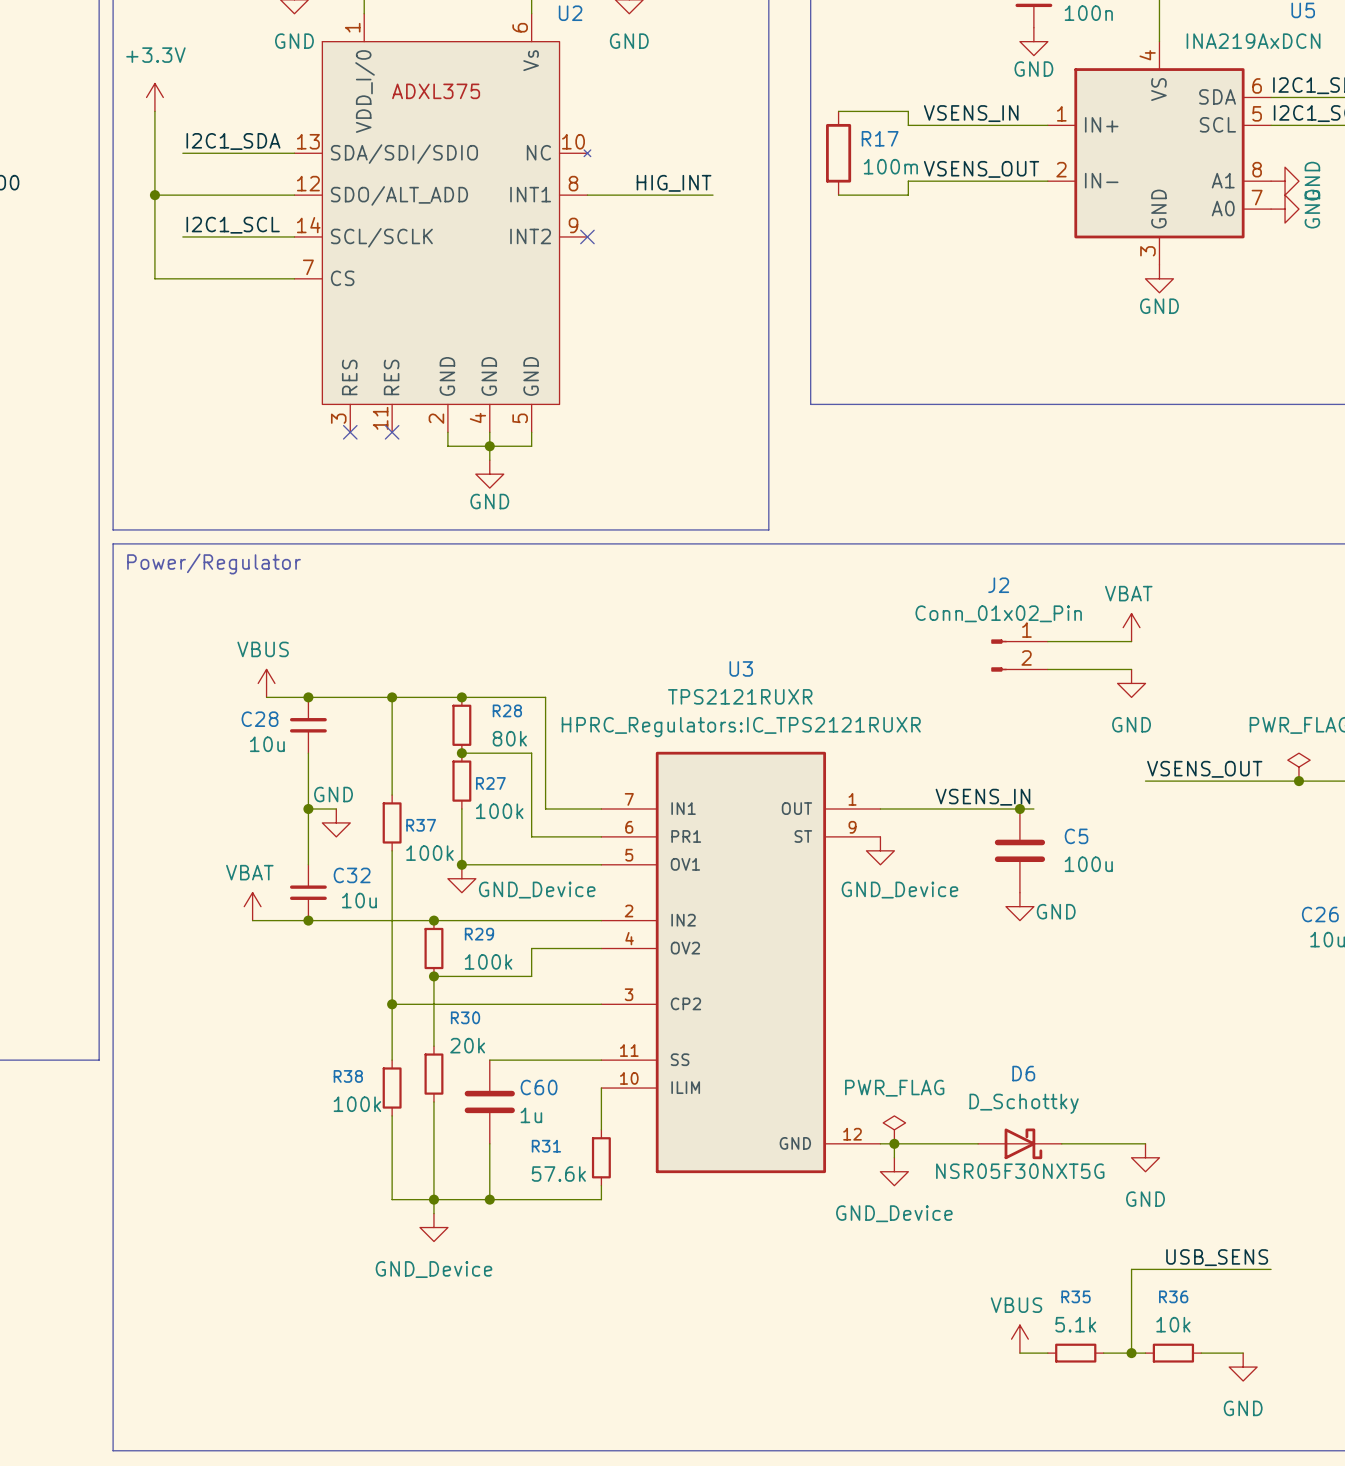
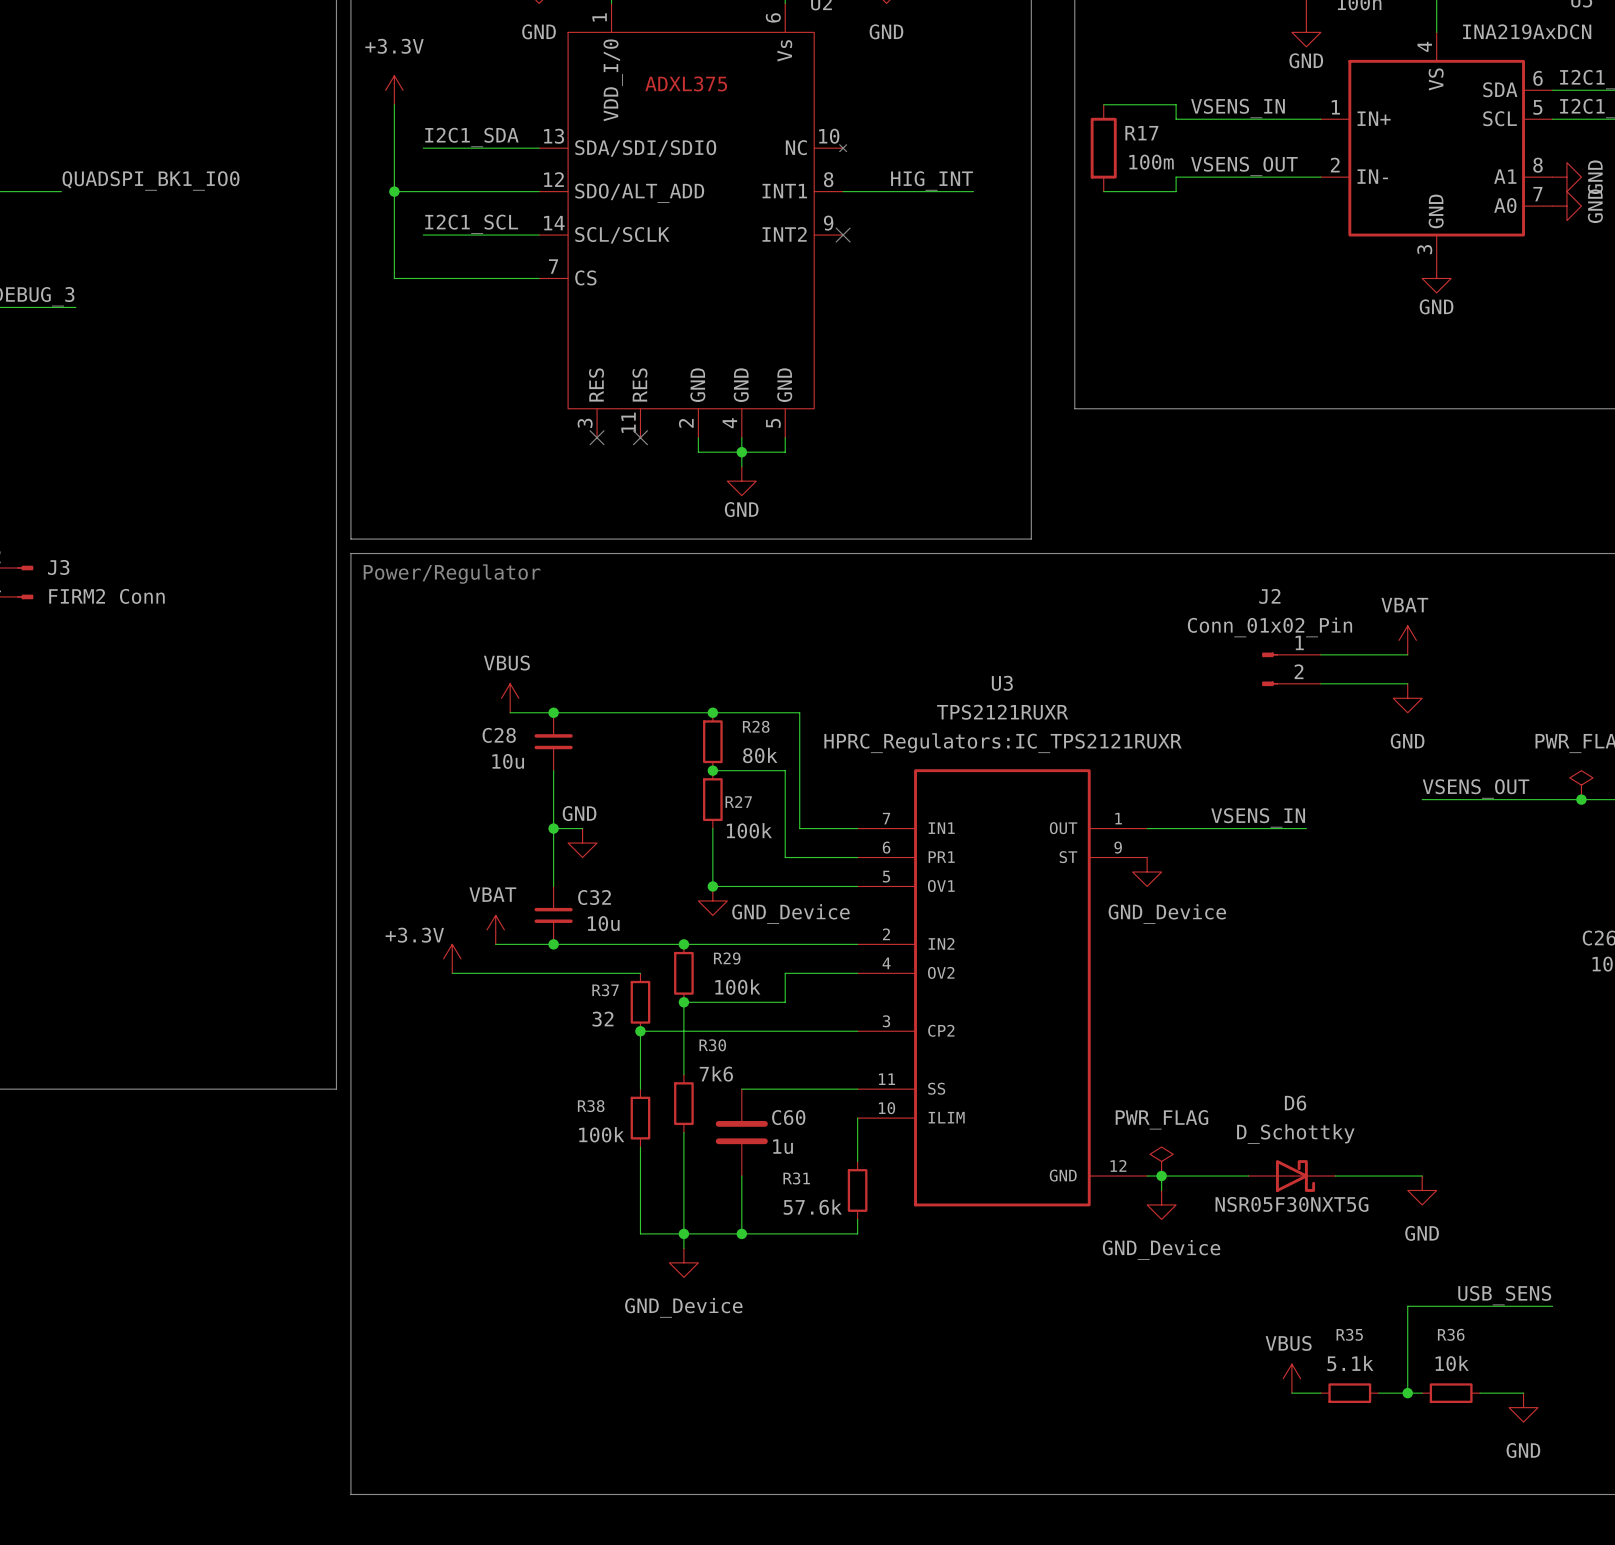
wire: (392, 697) (392, 795) -> none
junction: (392, 697) -> none
junction: (1019, 808) -> none
R37 position: (392, 822) -> (640, 1002)
R37 name position: R37 (421, 825) -> R37 (605, 990)
wire: (392, 850) (392, 1004) -> none
C5: 100u (1019, 850) -> none
R37 value: 100k (429, 853) -> 32 (603, 1019)
power symbol: GND (1019, 906) -> none
power symbol: none -> +3.3V (452, 958)
wire: none -> (452, 973) (640, 973)
R30 value: 20k (467, 1045) -> 7k6 (716, 1073)

